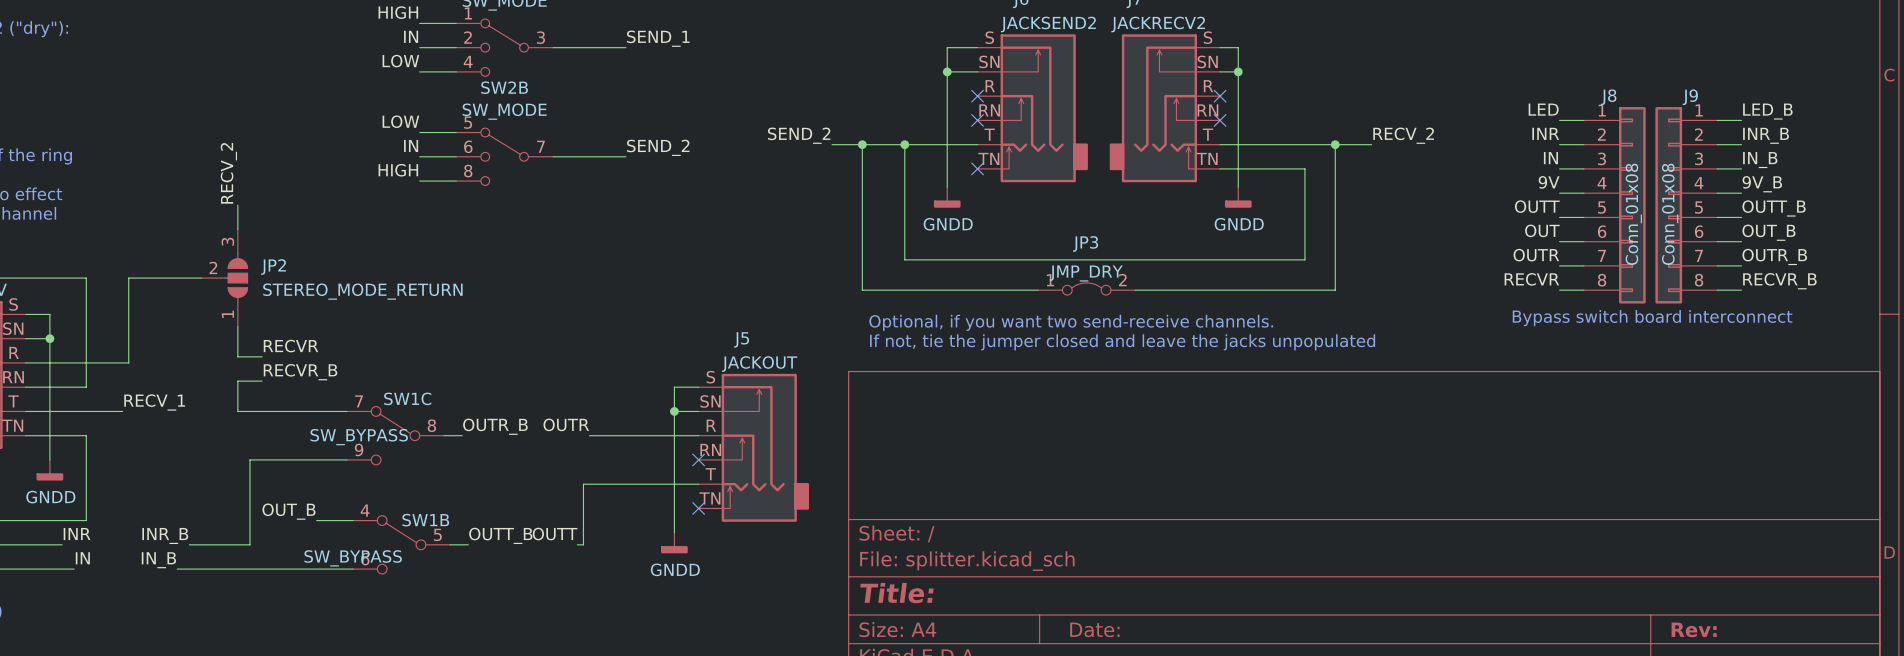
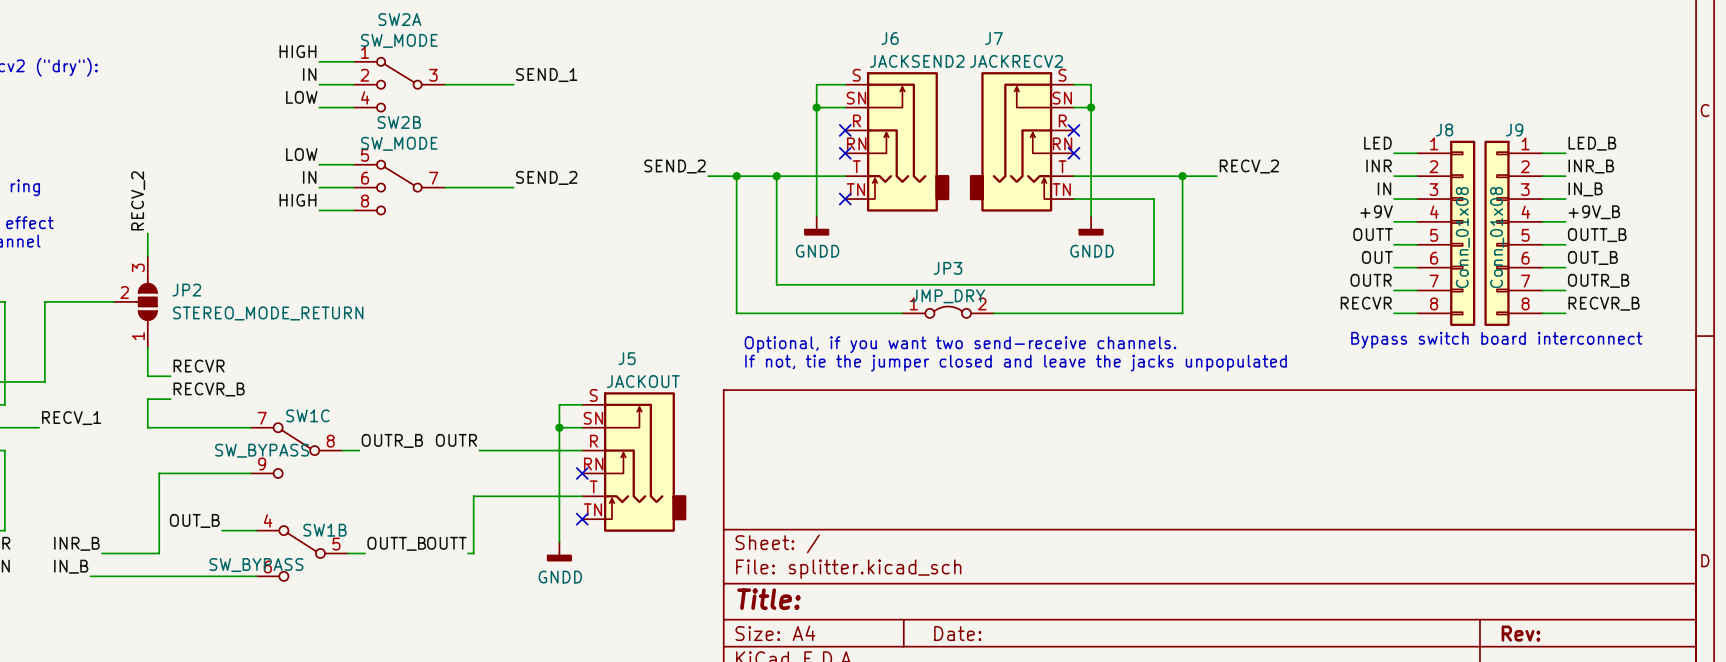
label: 9V (1549, 182) -> +9V (1376, 211)
label: 9V_B (1762, 184) -> +9V_B (1594, 212)

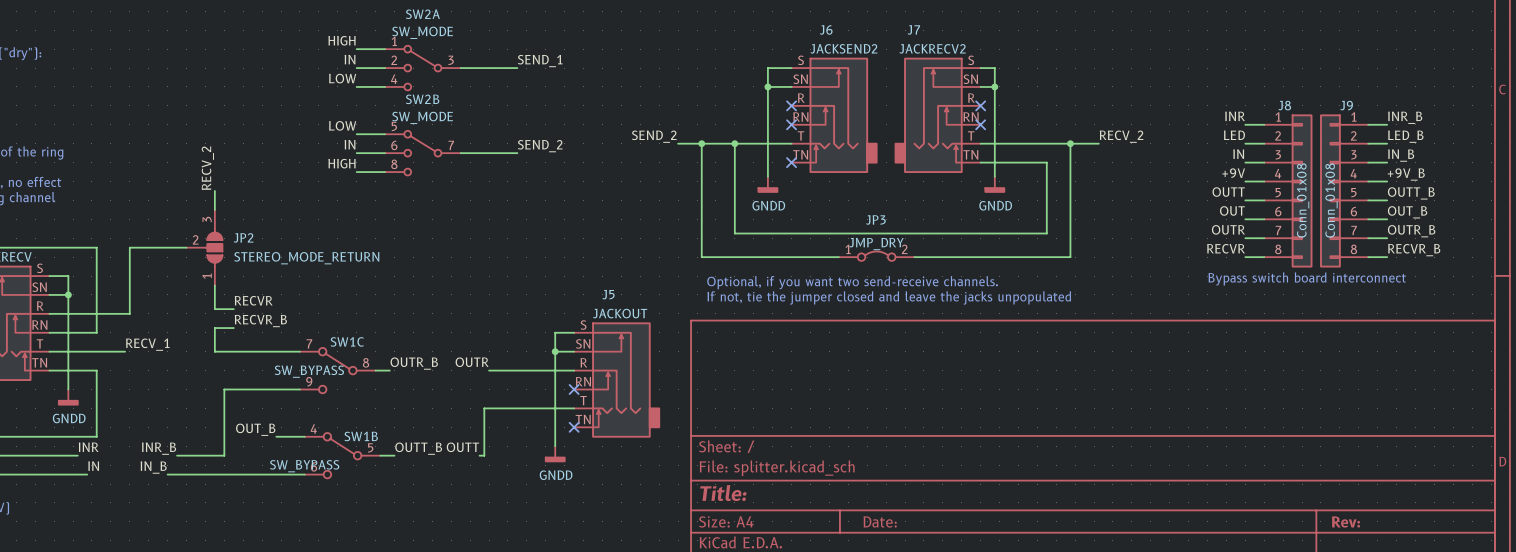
label: LED (1377, 143) -> INR (1235, 116)
label: LED_B (1592, 143) -> INR_B (1405, 117)
label: INR (1379, 165) -> LED (1234, 135)
label: INR_B (1591, 166) -> LED_B (1405, 136)

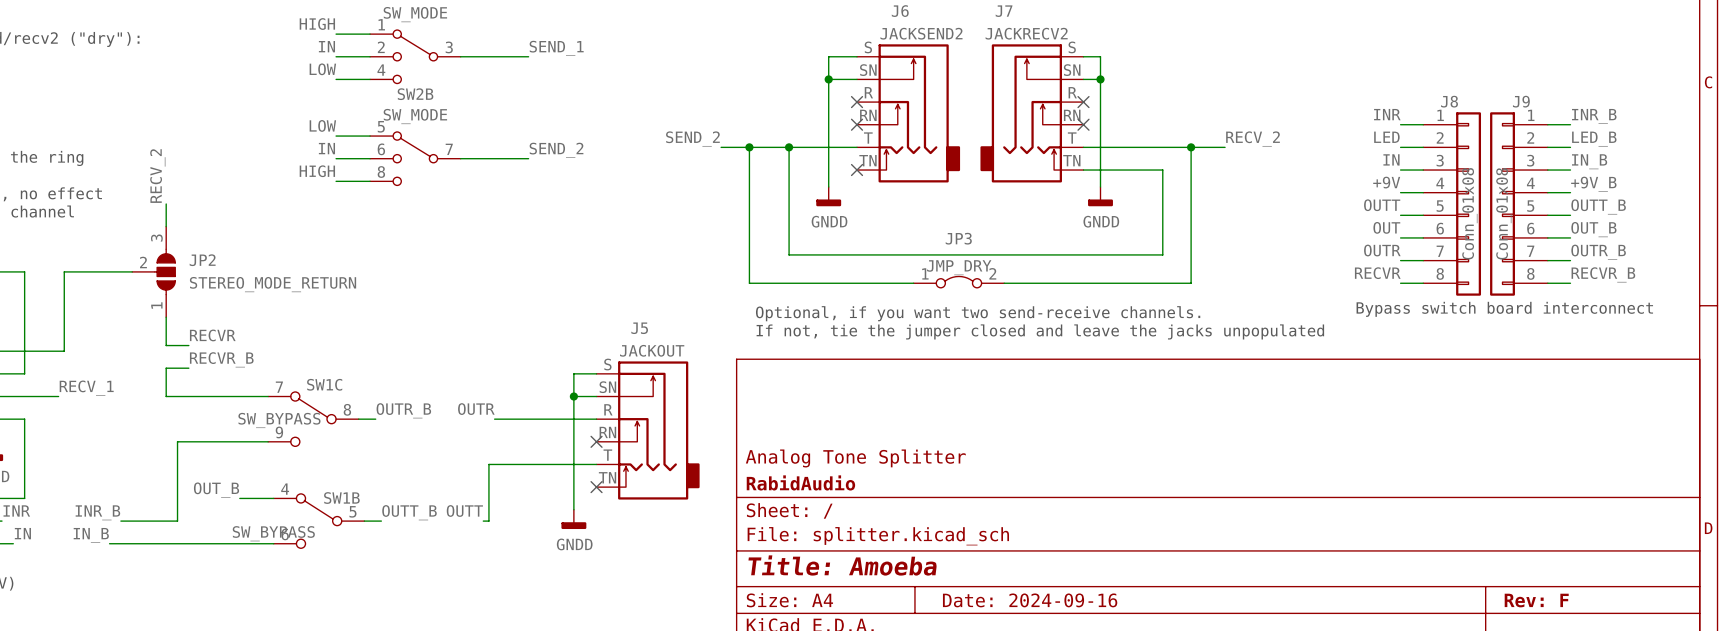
title block: none -> Analog Tone Splitter (855, 458)
title block: none -> RabidAudio (800, 482)
title block: Title: (723, 493) -> Title: Amoeba (842, 565)
title block: Date: (880, 521) -> Date: 2024-09-16 (1030, 600)
title block: Rev: (1345, 522) -> Rev: F (1536, 600)

